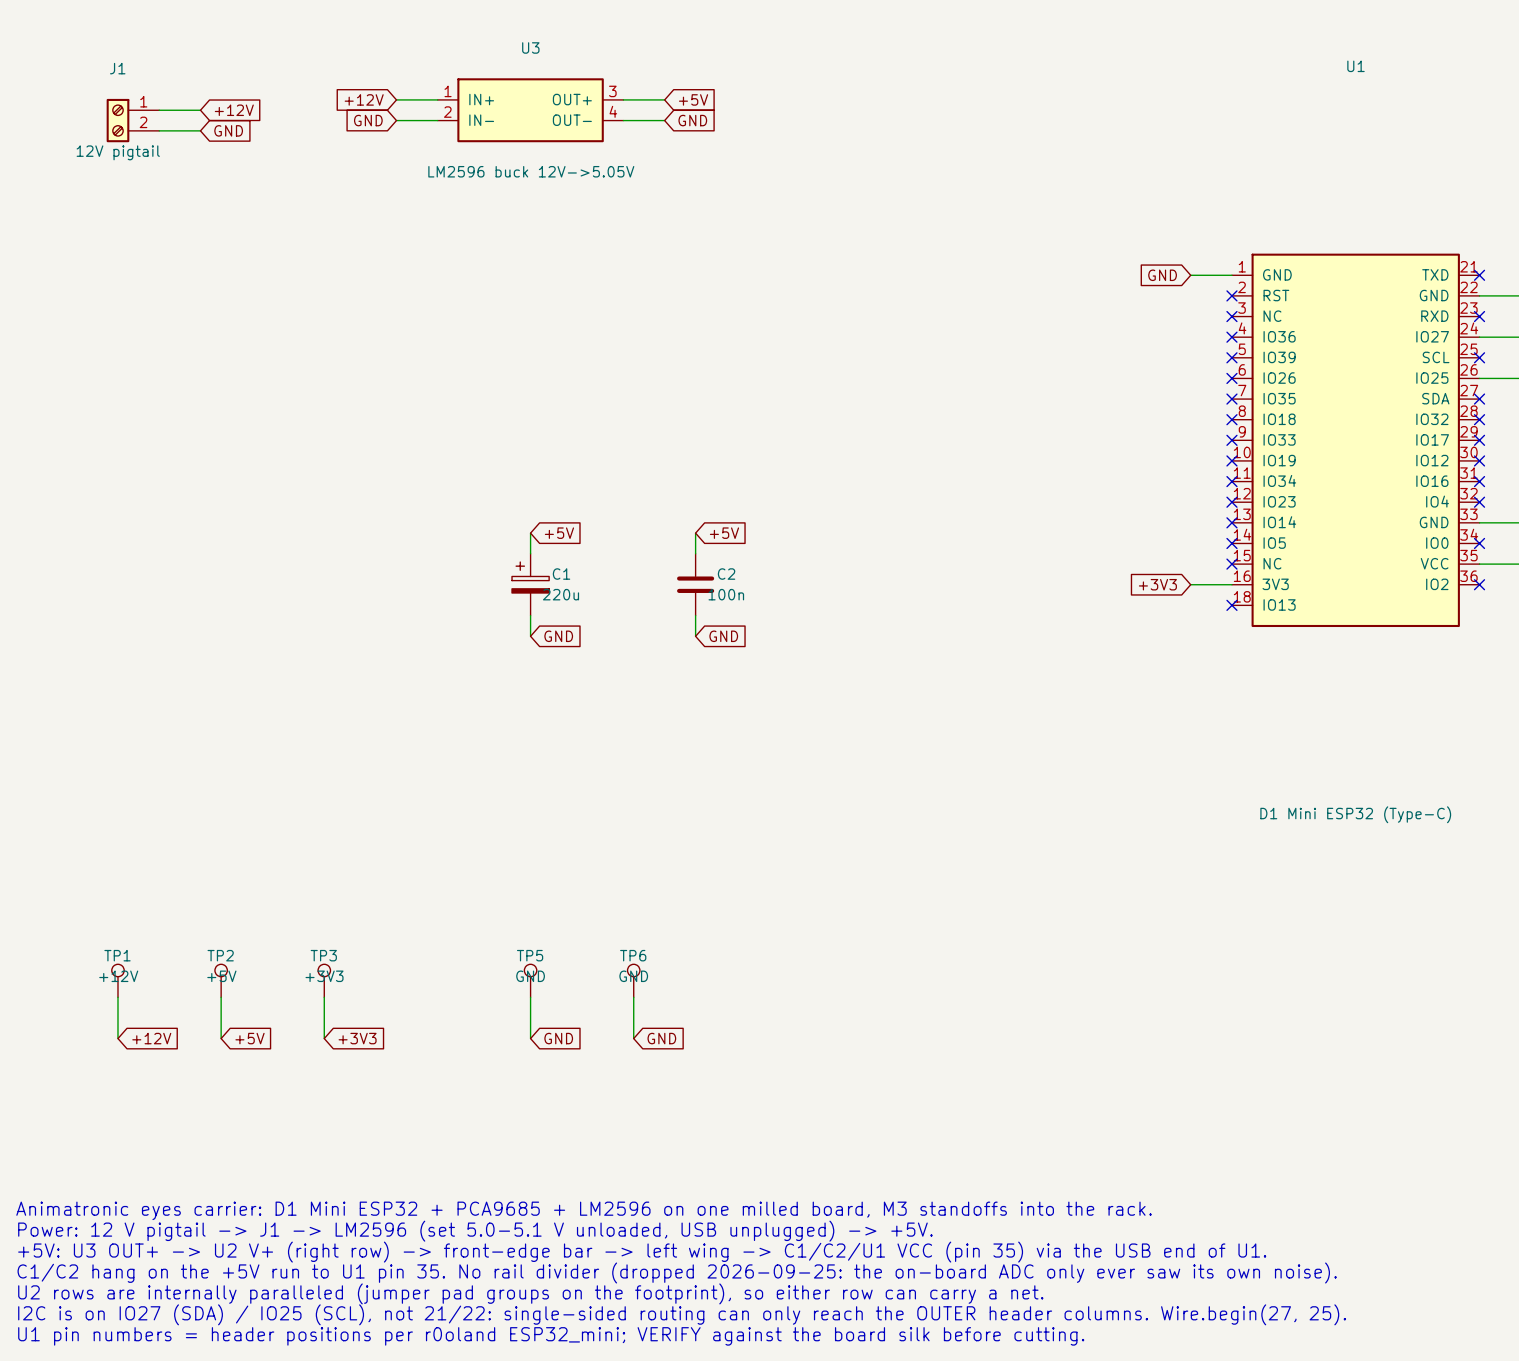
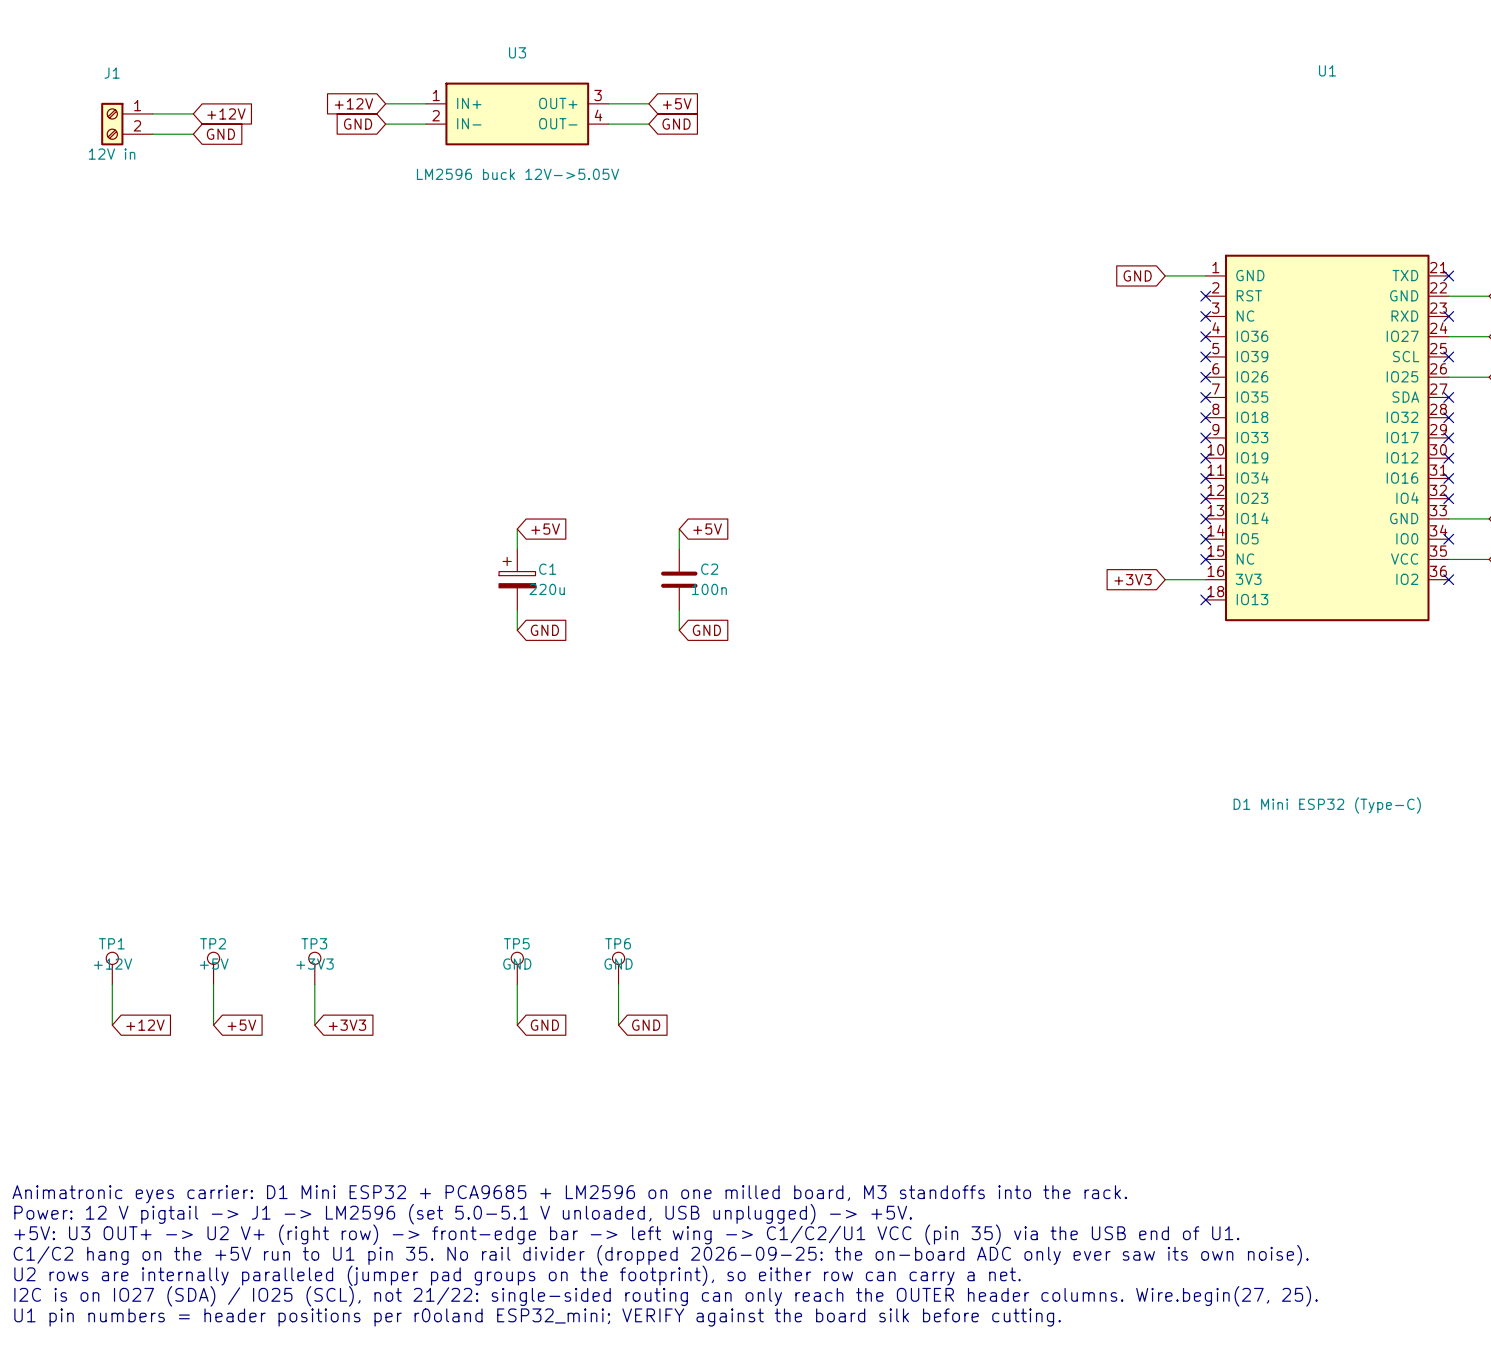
J1 value: 12V pigtail (118, 152) -> 12V in (112, 154)

